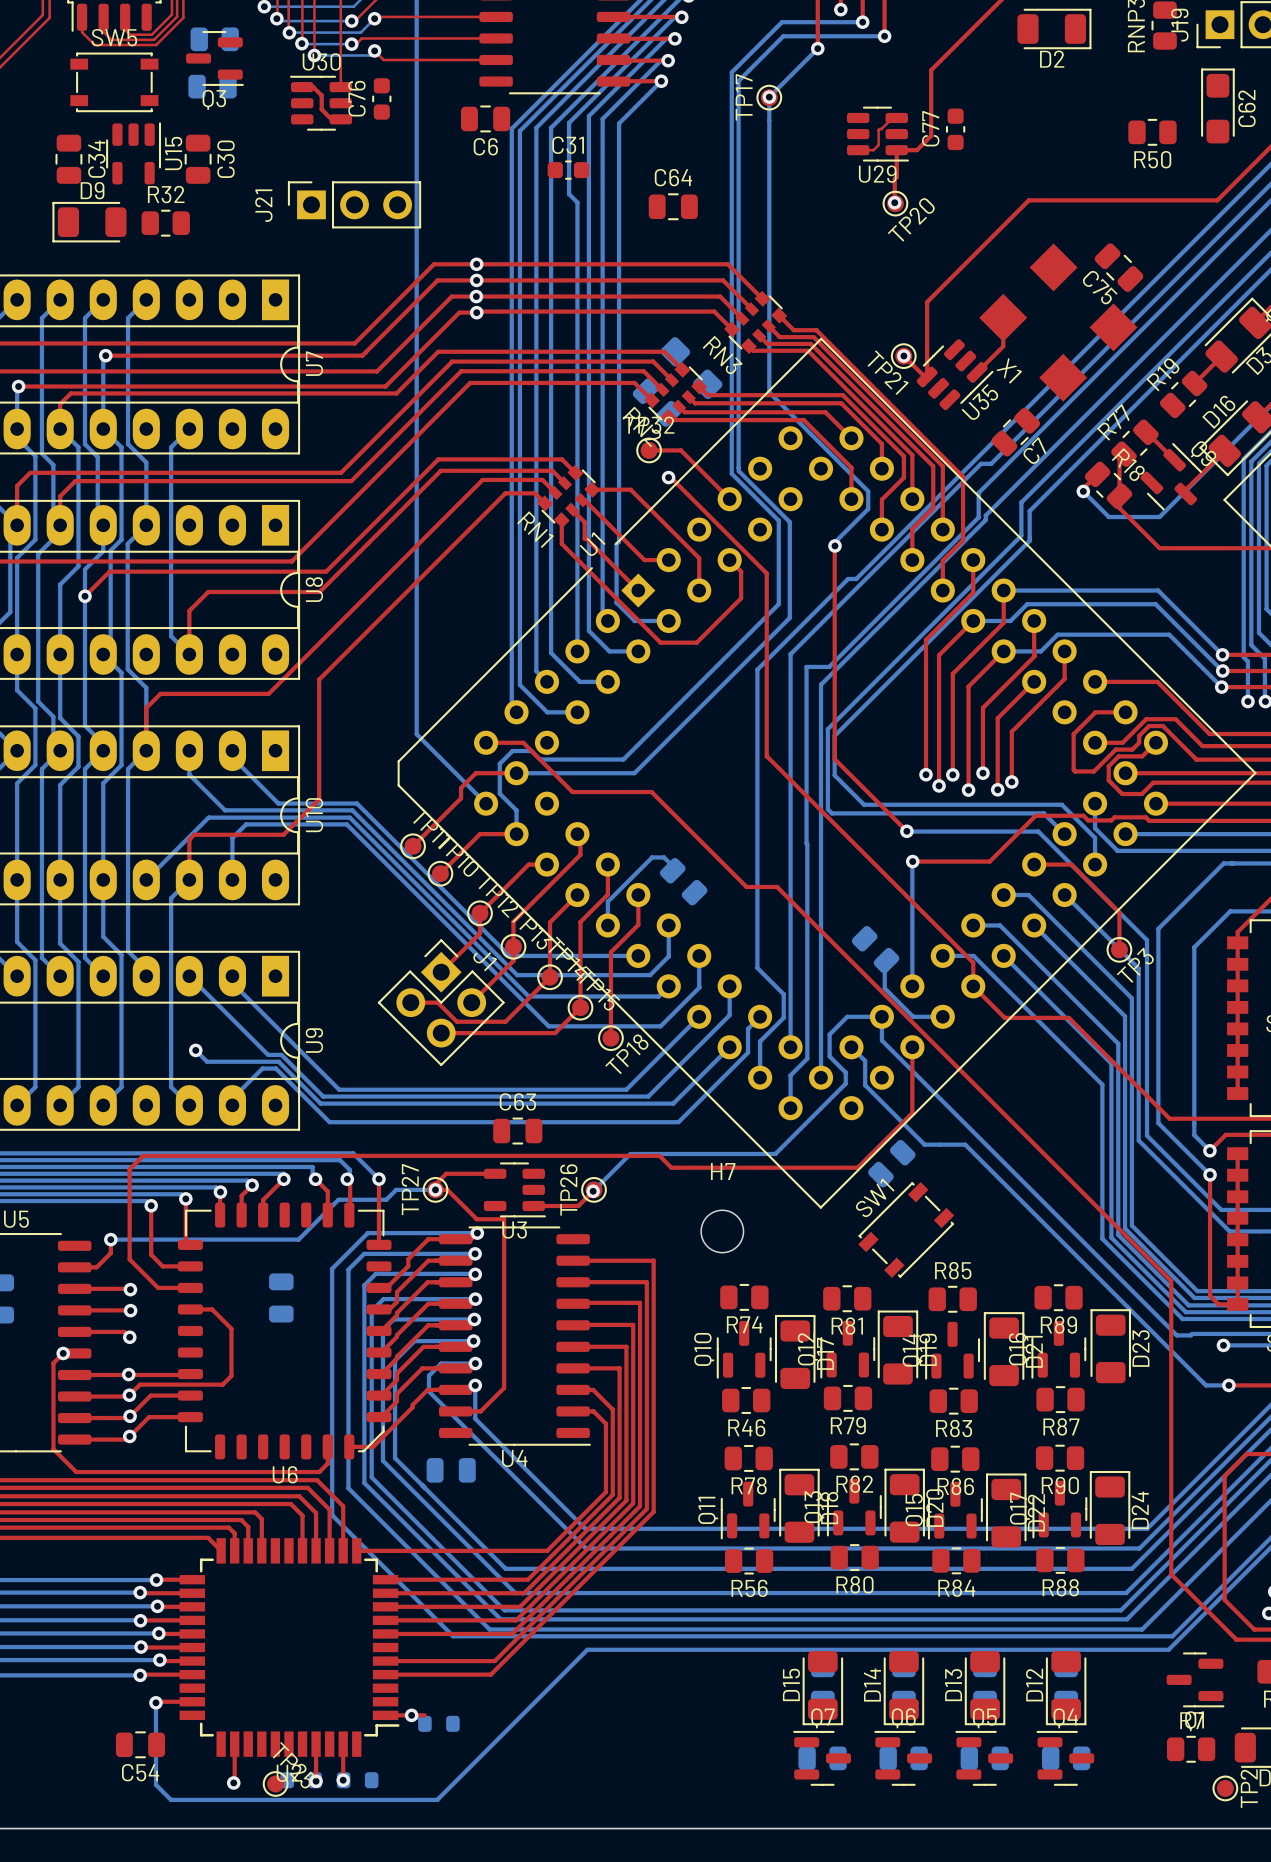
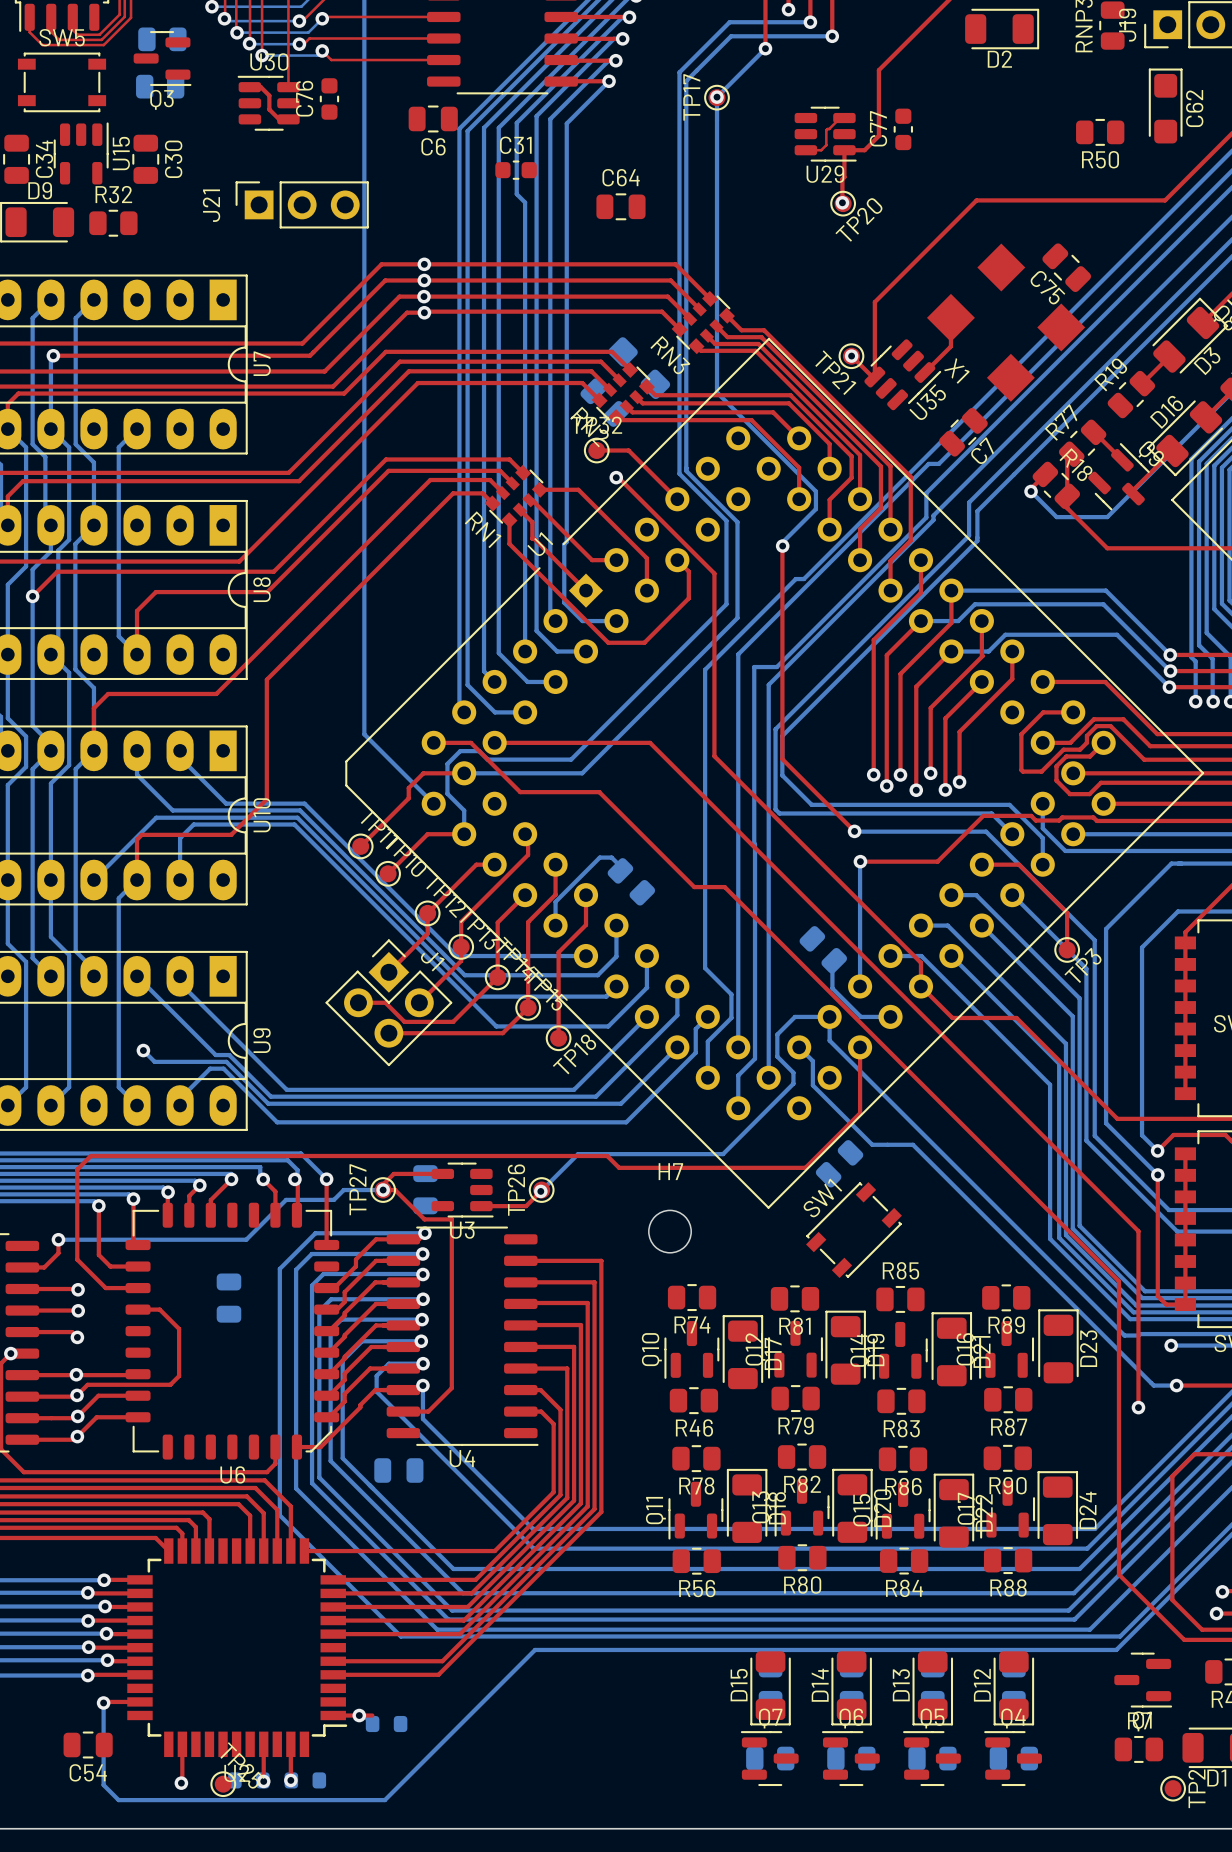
top track: none -> (494, 742) (650, 742) (1138, 1231) (1138, 1407)
C63 side: top (517, 1131) -> bottom (425, 1189)
via: none -> (1138, 1407)

